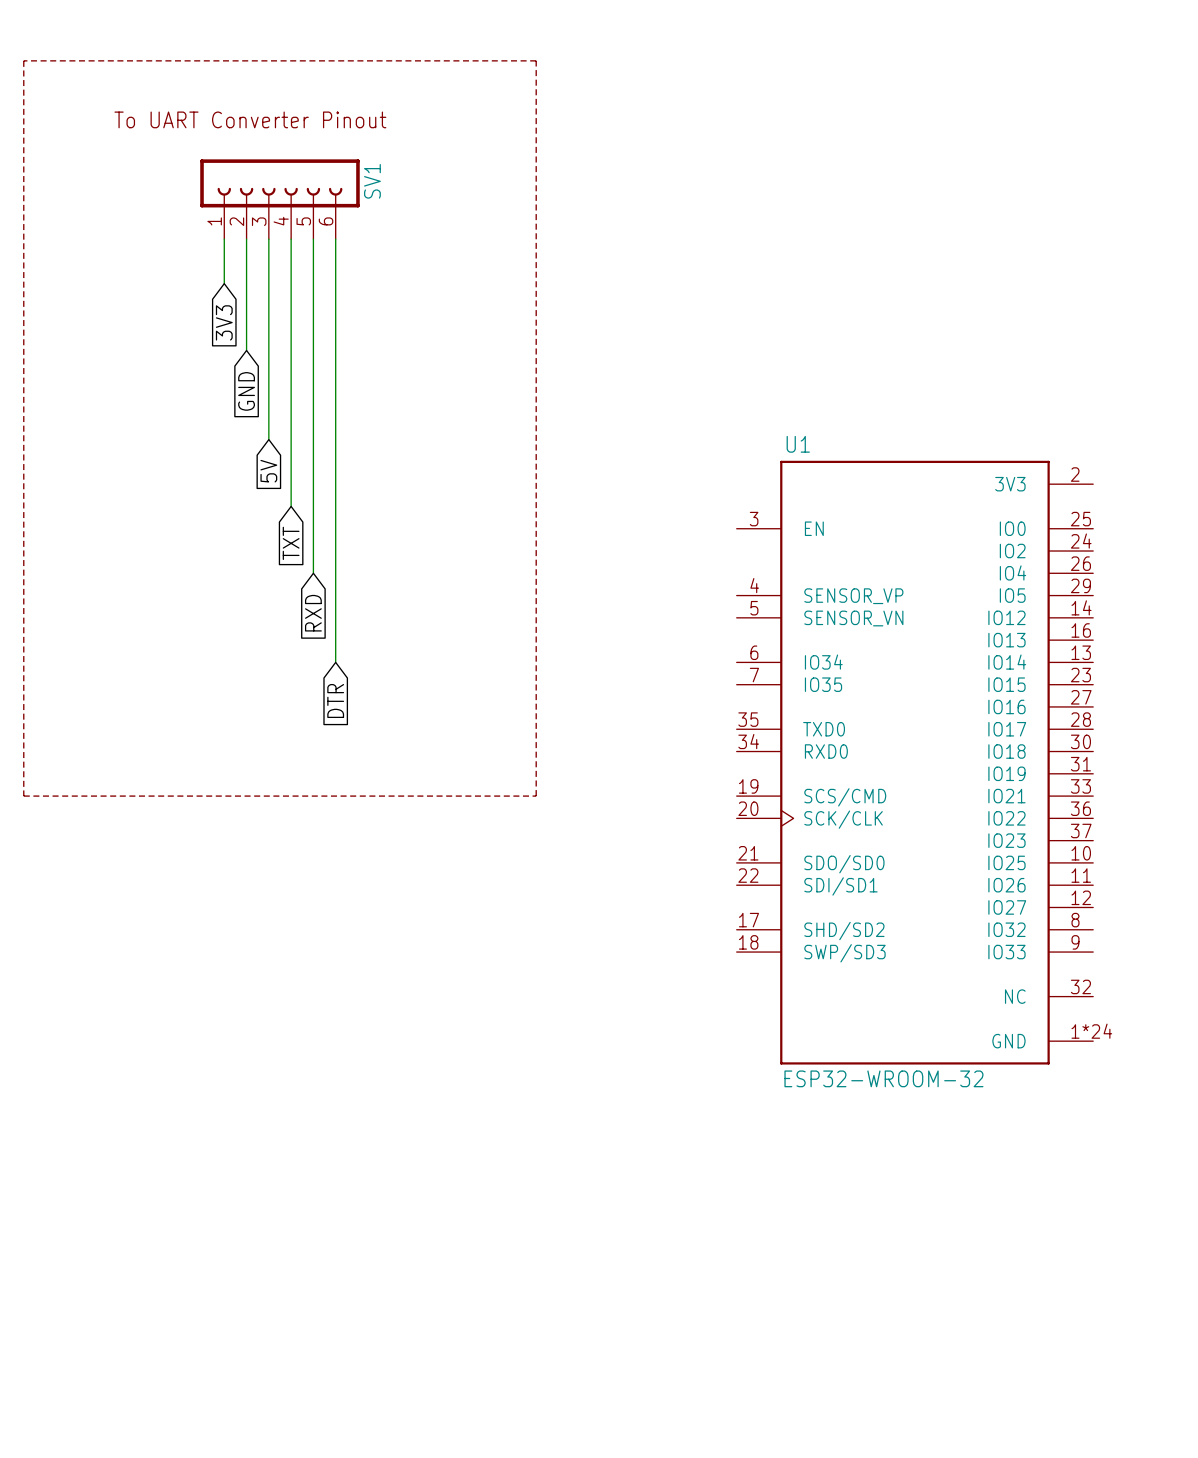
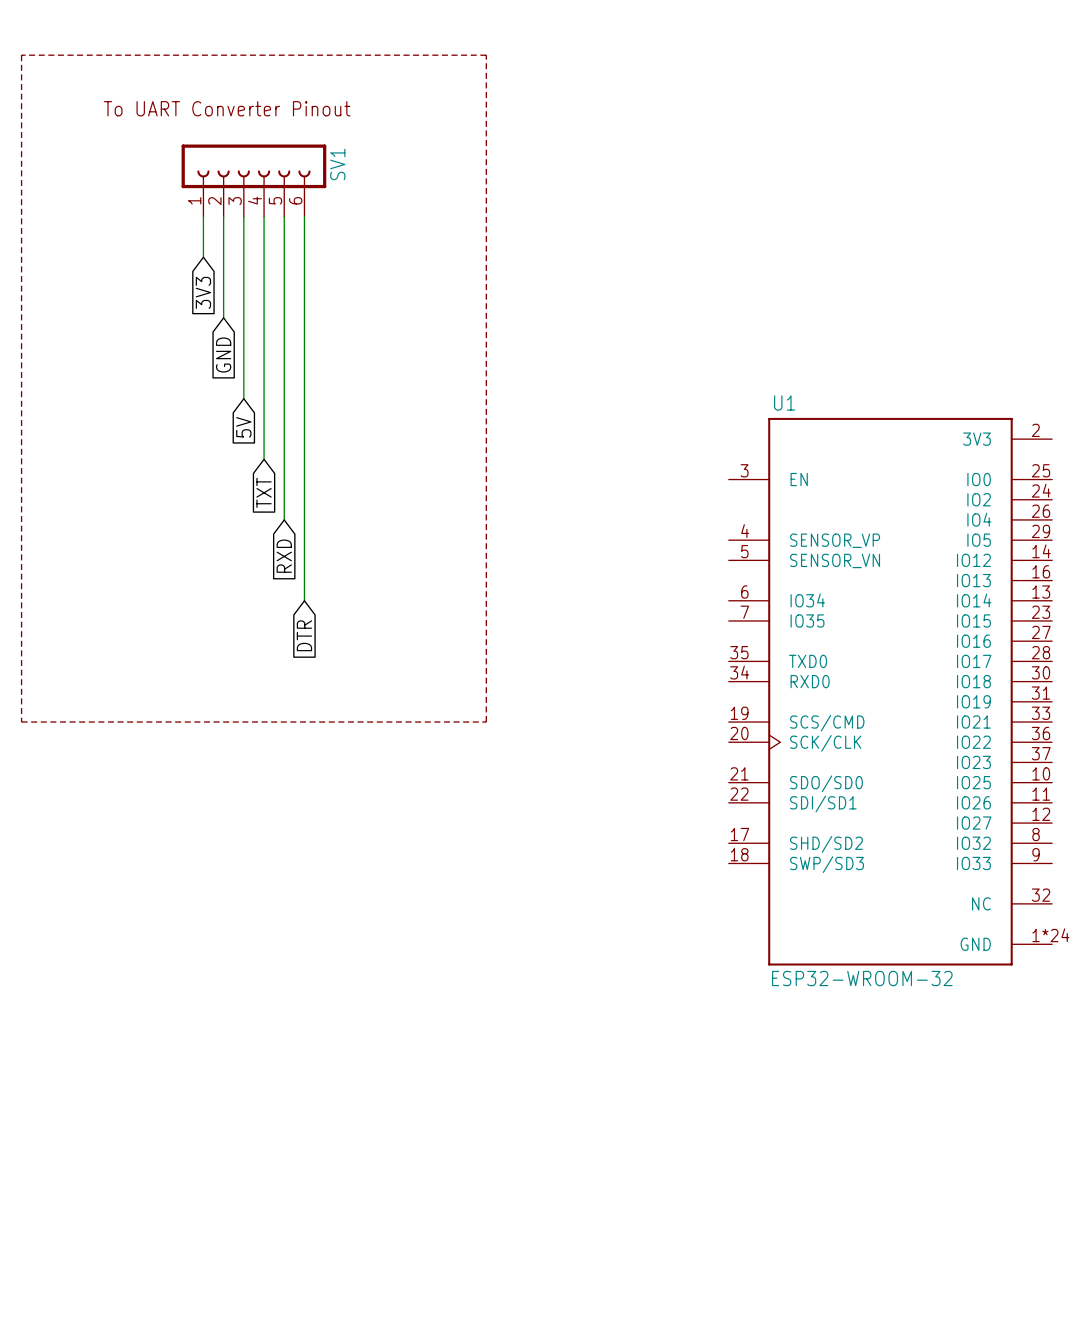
U1 position: (914, 762) -> (890, 691)

